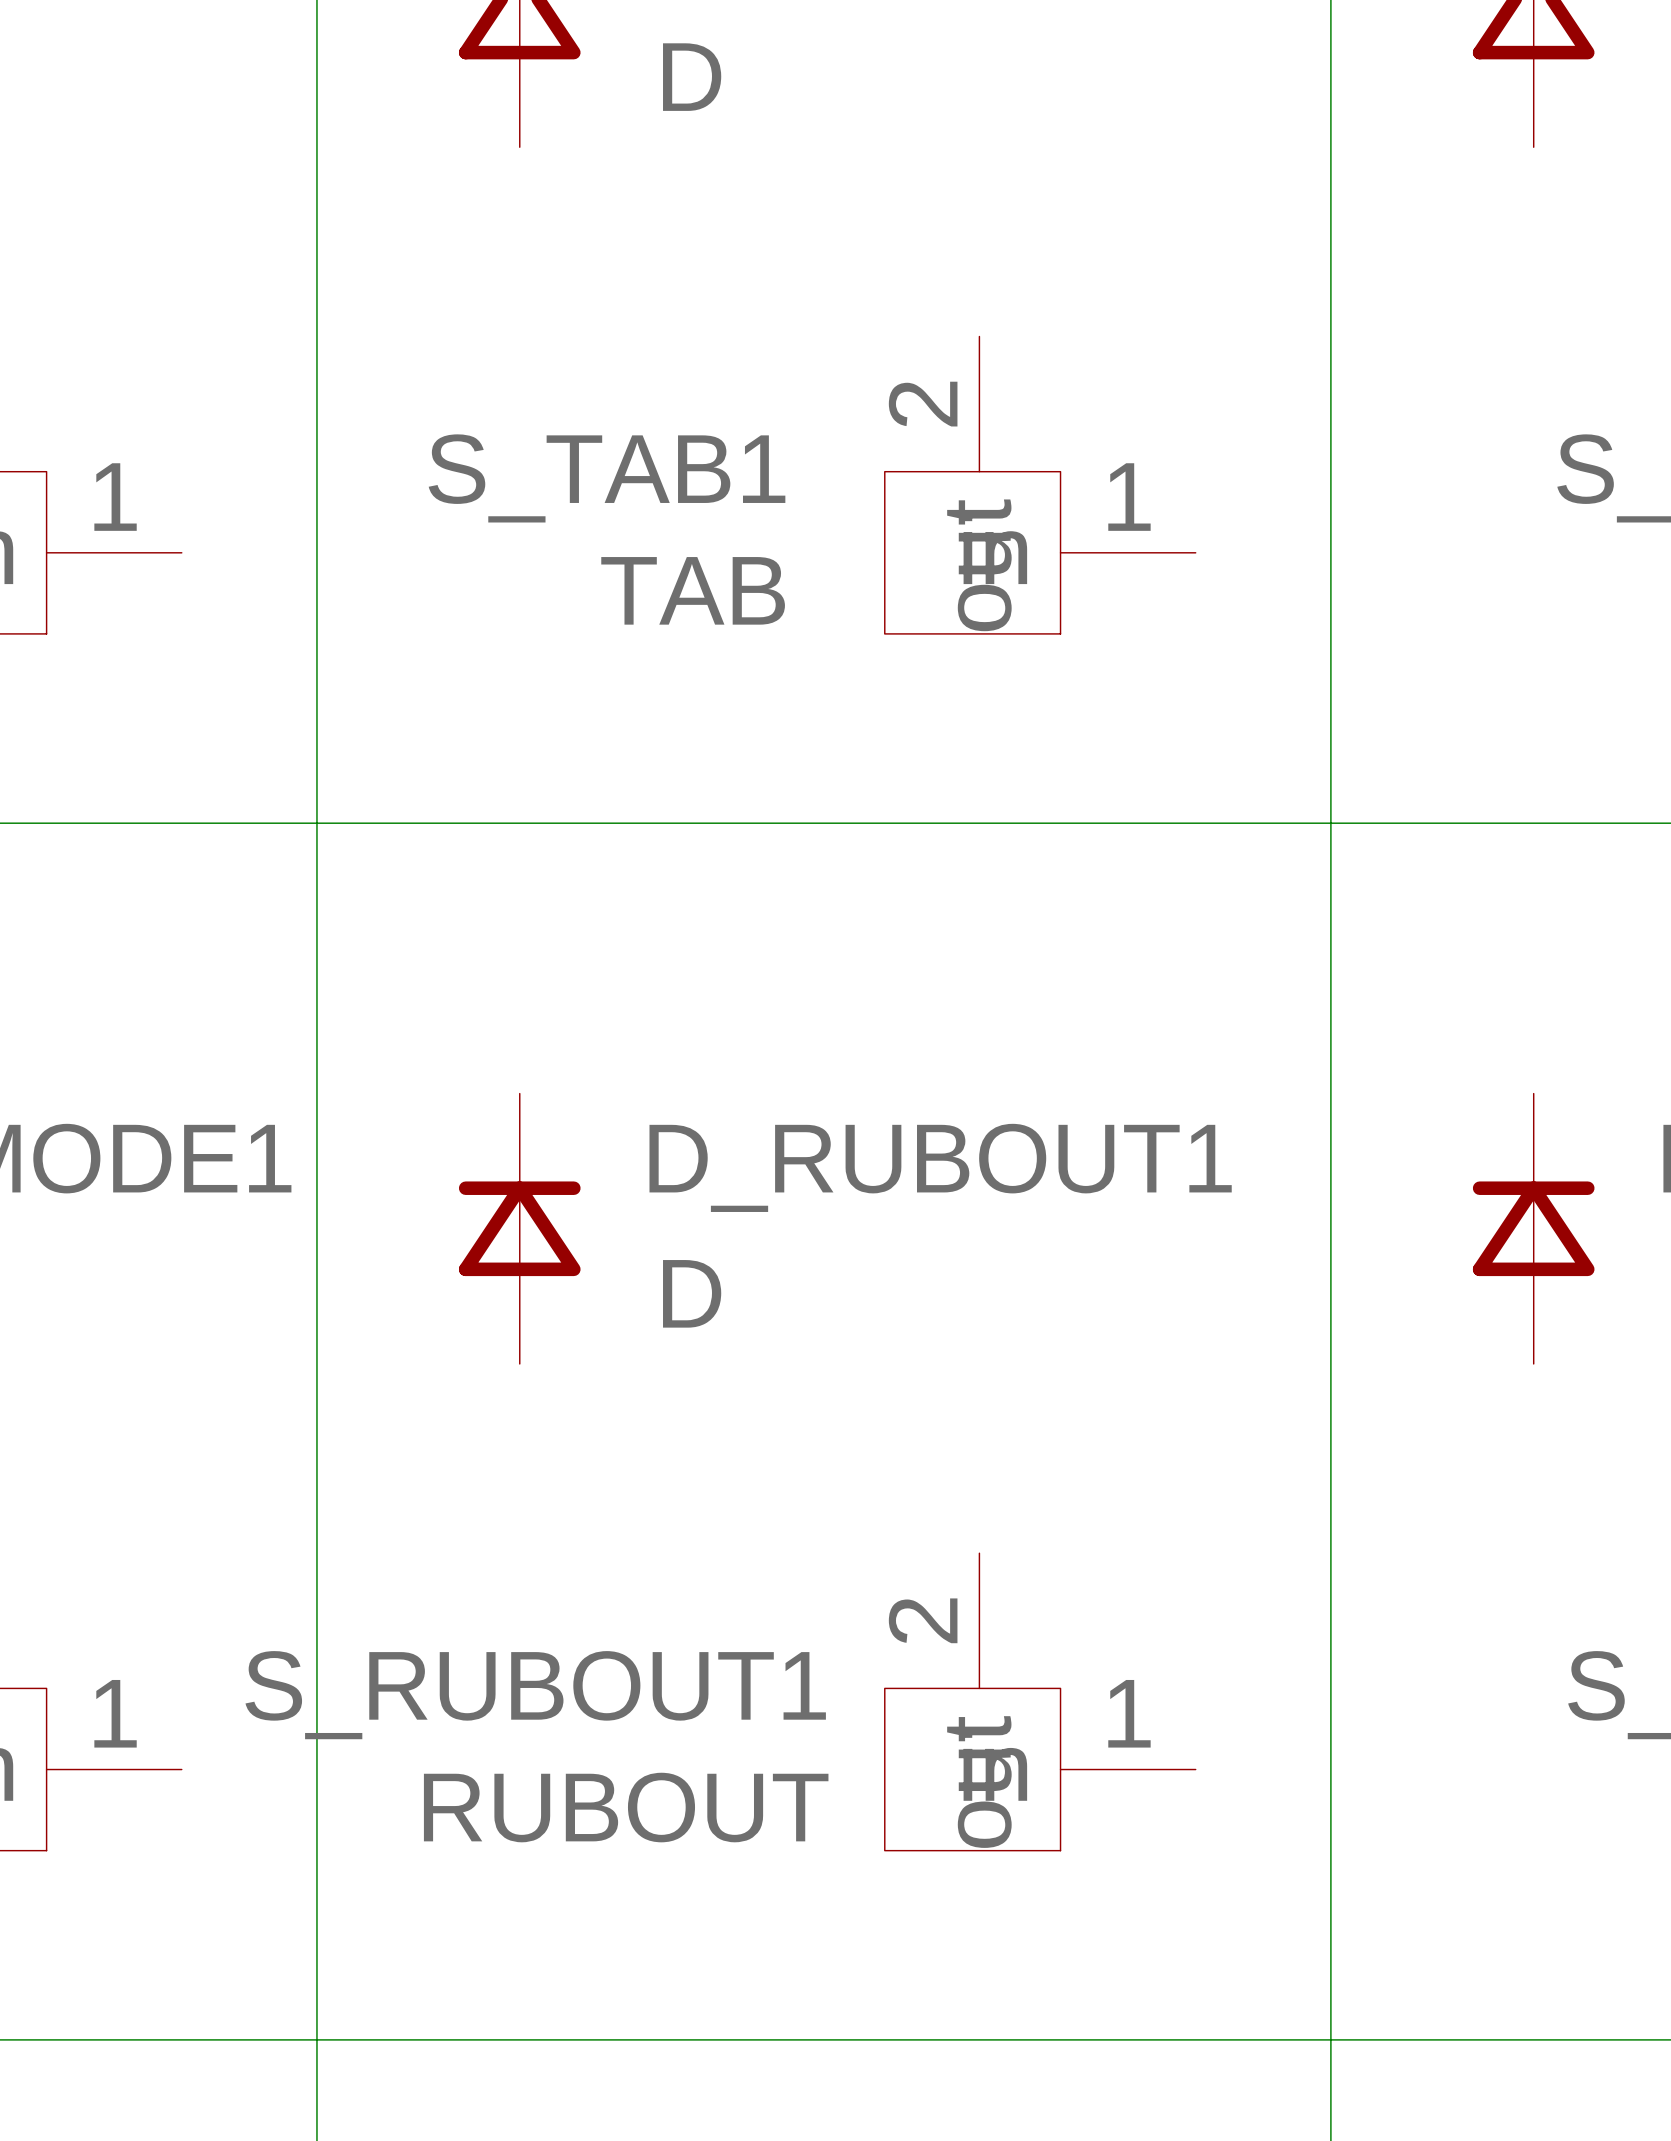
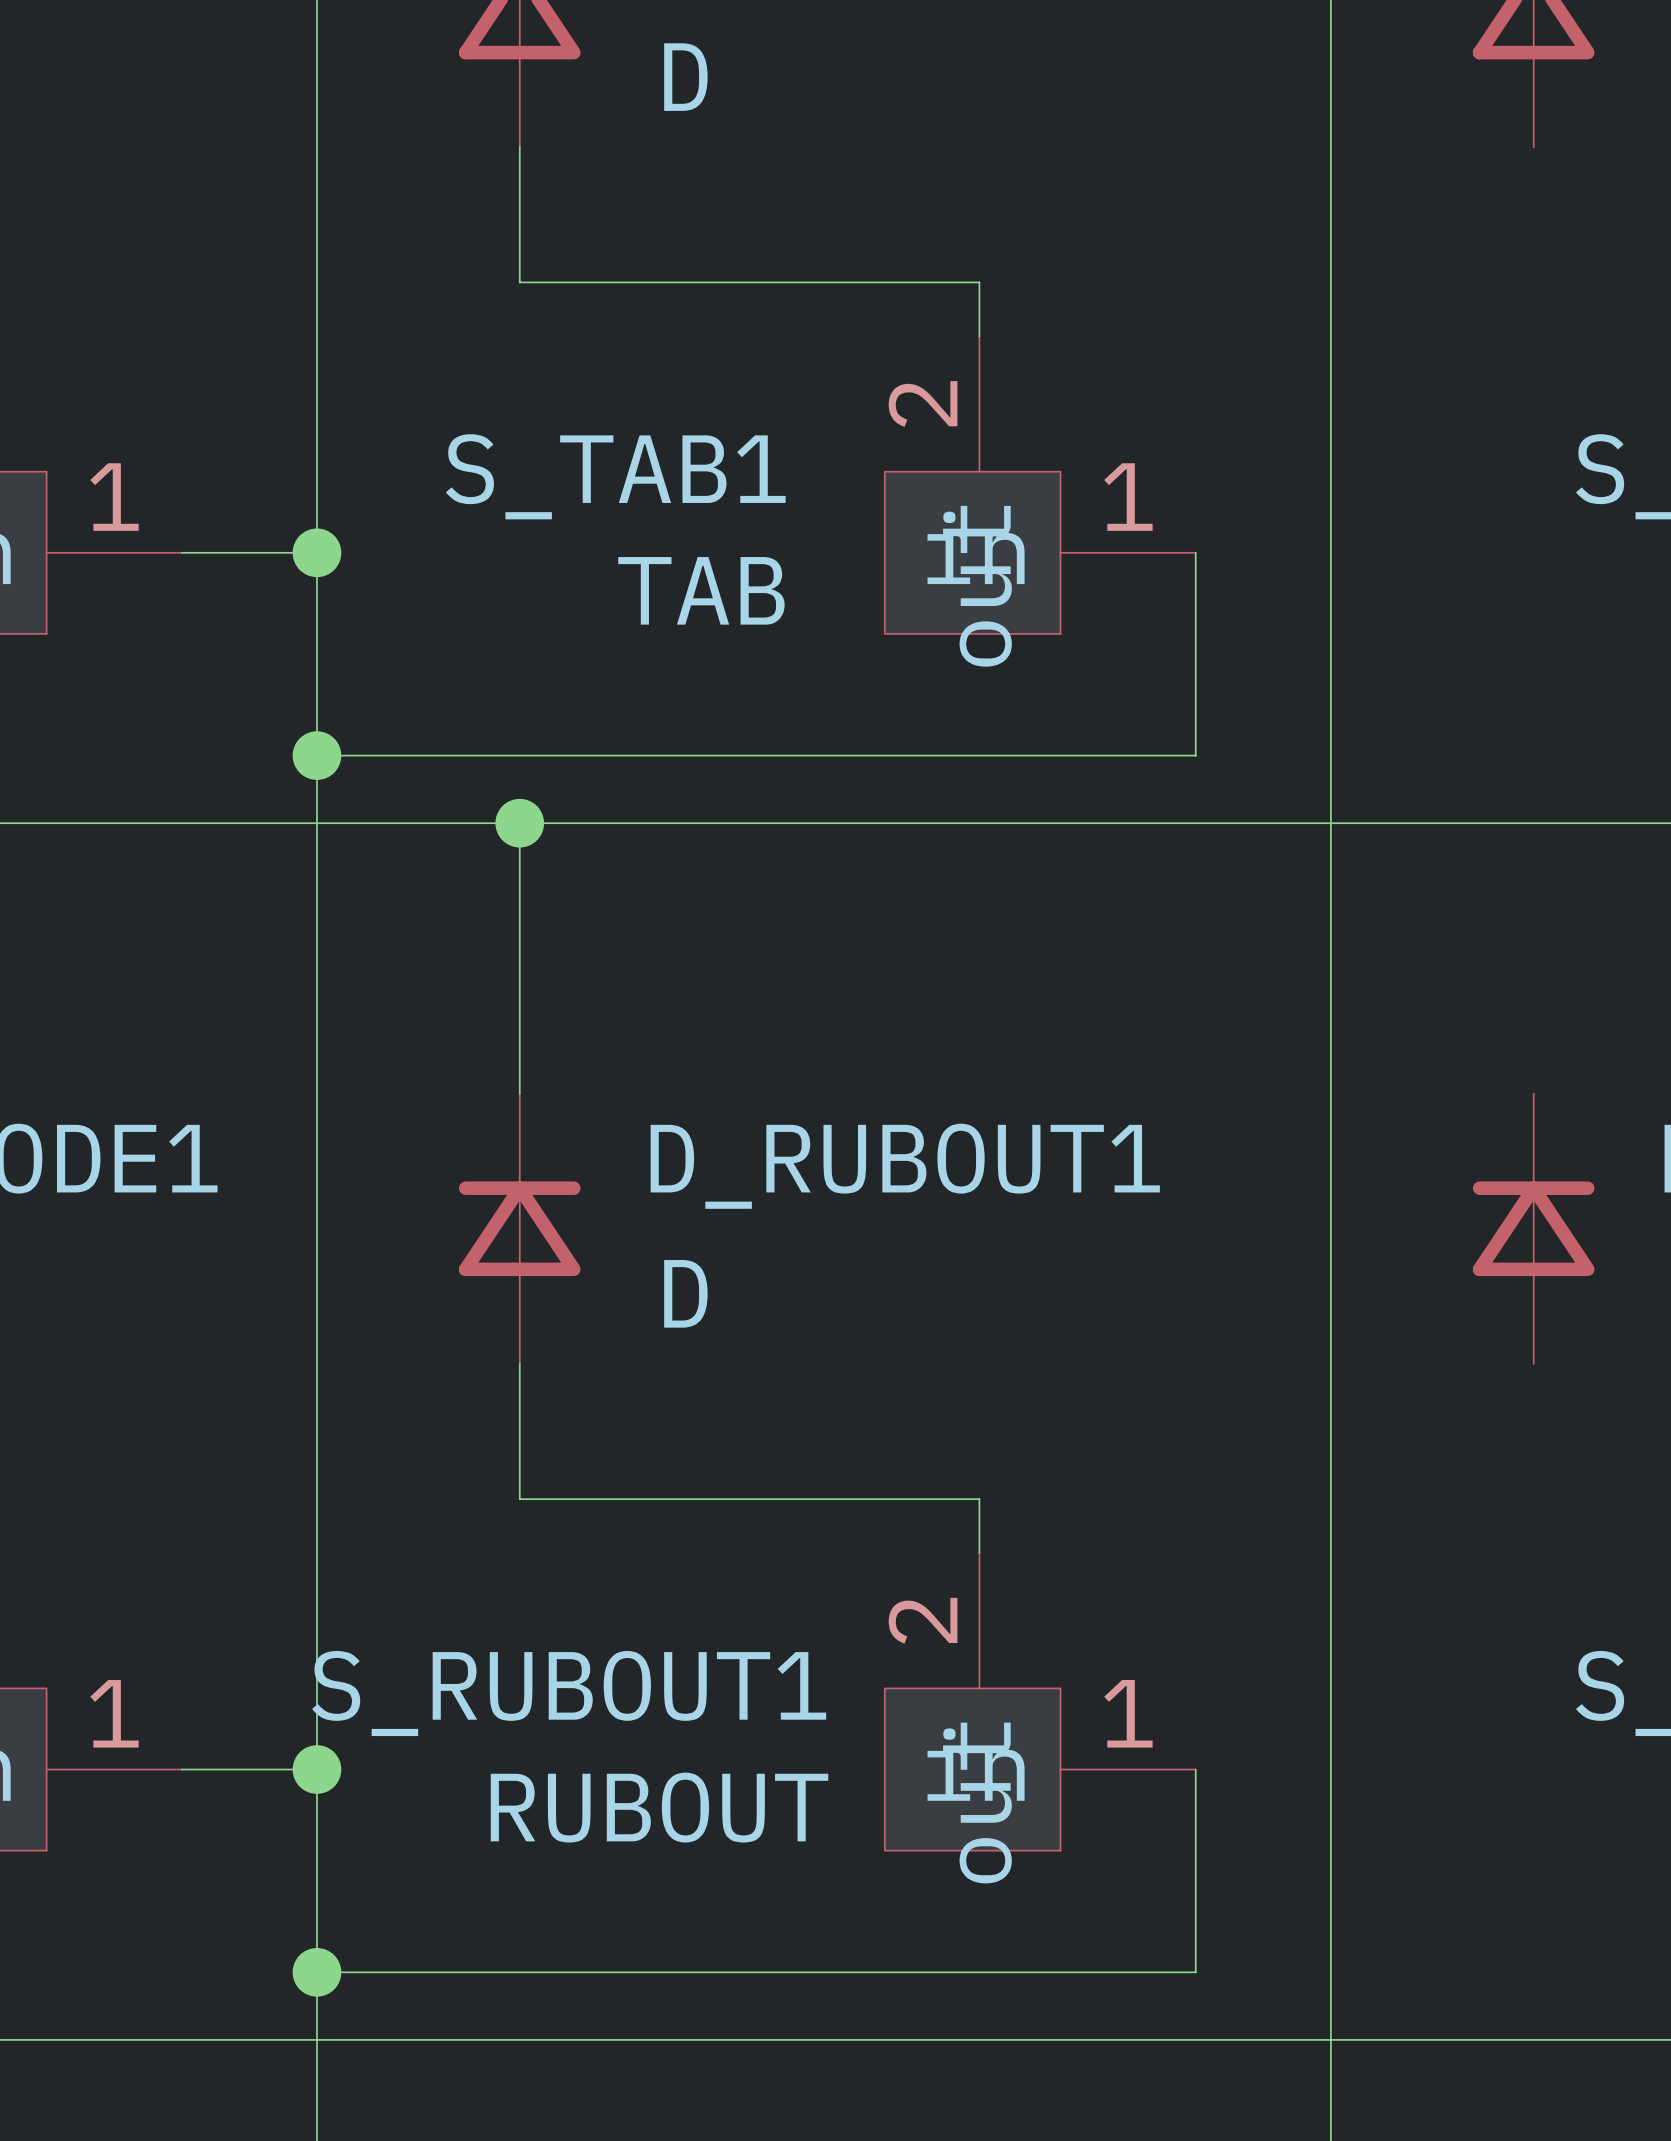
wire: none -> (519, 147) (519, 282) (979, 282) (979, 336)
wire: none -> (181, 552) (316, 552)
junction: none -> (316, 552)
wire: none -> (1195, 552) (1195, 755) (316, 755)
junction: none -> (316, 755)
wire: none -> (519, 823) (519, 1093)
junction: none -> (519, 823)
wire: none -> (519, 1363) (519, 1499) (979, 1499) (979, 1553)
wire: none -> (181, 1769) (316, 1769)
junction: none -> (316, 1769)
wire: none -> (1195, 1769) (1195, 1972) (316, 1972)
junction: none -> (316, 1972)

